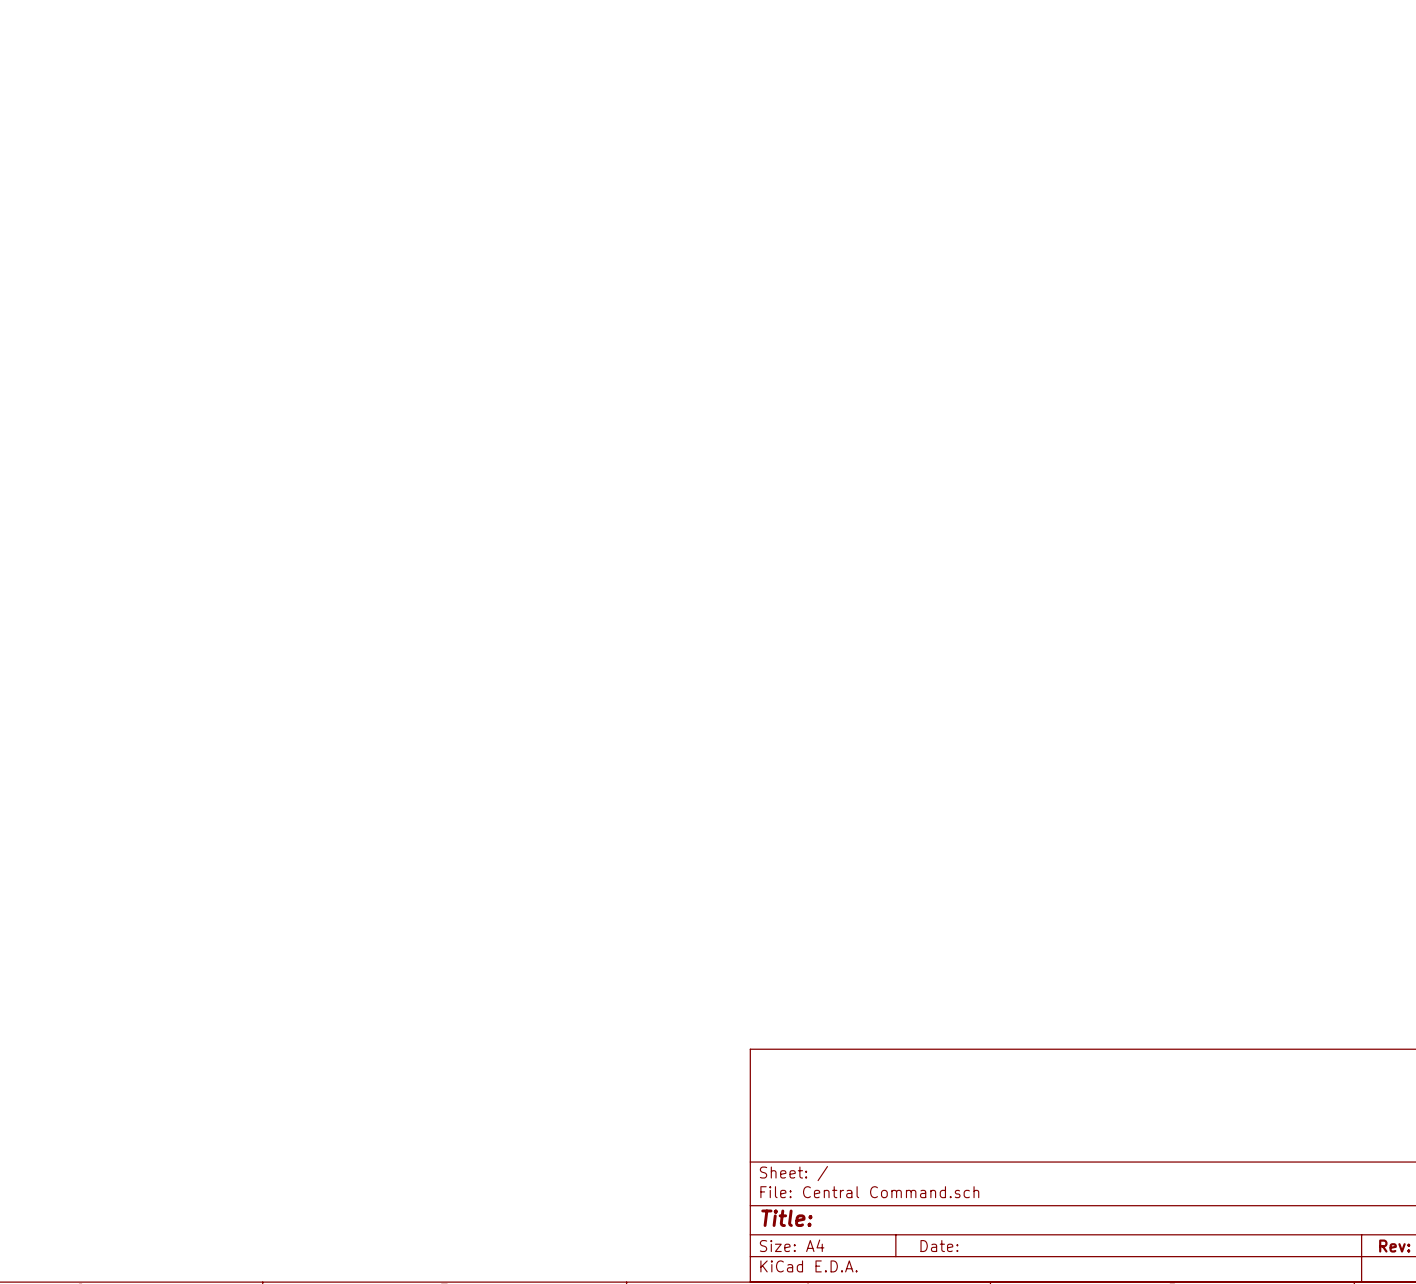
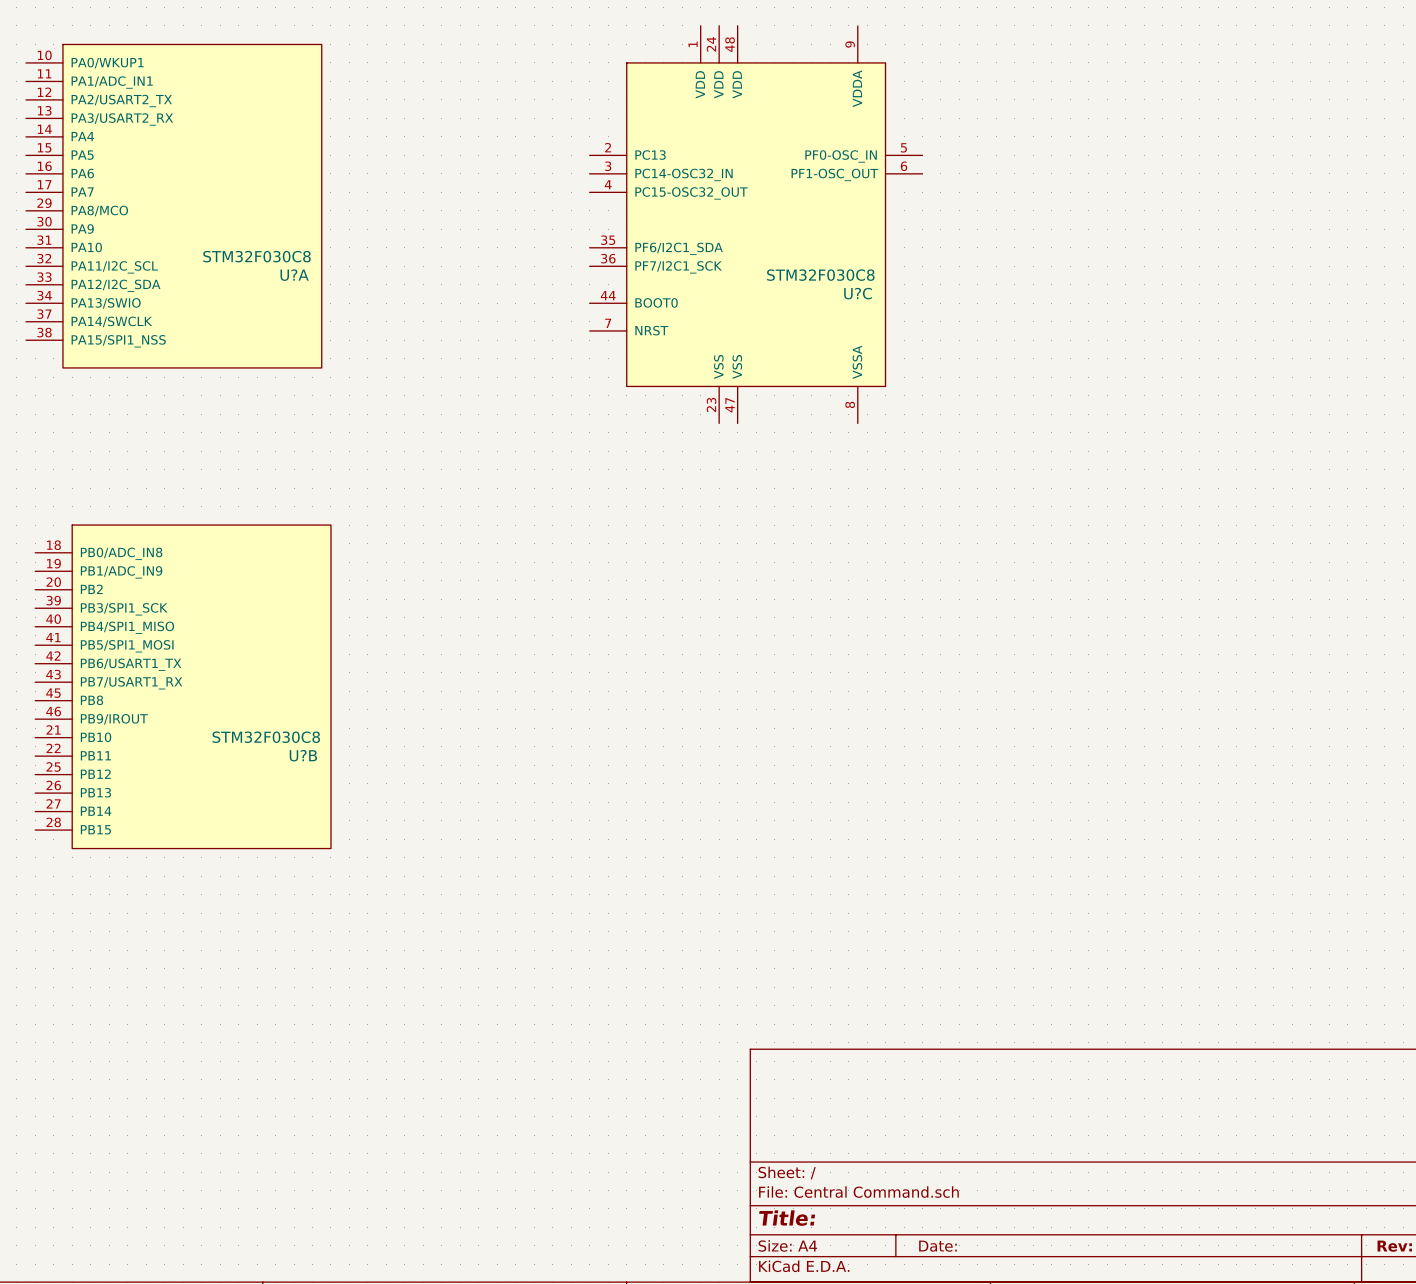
U?A: none -> STM32F030C8 (173, 206)
U?C: none -> STM32F030C8 (756, 224)
U?B: none -> STM32F030C8 (183, 686)

